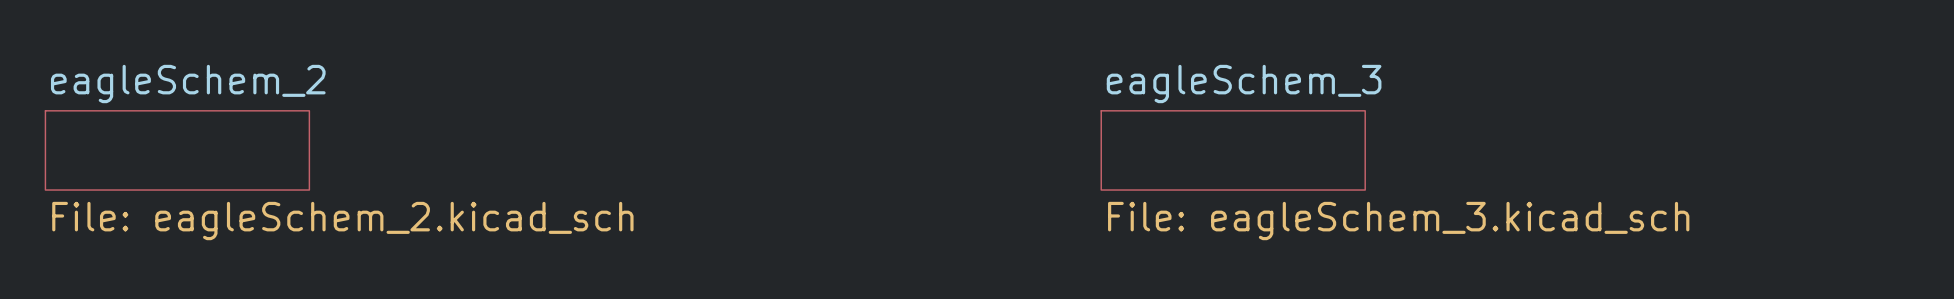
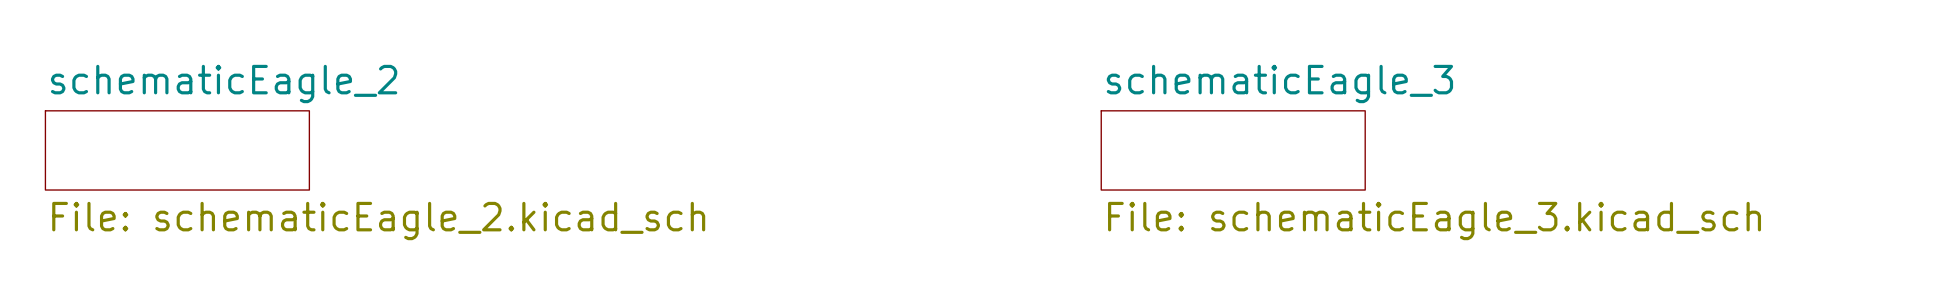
sheet eagleSchem_2 name: eagleSchem_2 (188, 84) -> schematicEagle_2 (224, 84)
sheet eagleSchem_3 name: eagleSchem_3 (1244, 84) -> schematicEagle_3 (1279, 84)
sheet eagleSchem_2 value: File: eagleSchem_2.kicad_sch (342, 221) -> File: schematicEagle_2.kicad_sch (378, 221)
sheet eagleSchem_3 value: File: eagleSchem_3.kicad_sch (1398, 221) -> File: schematicEagle_3.kicad_sch (1434, 221)

